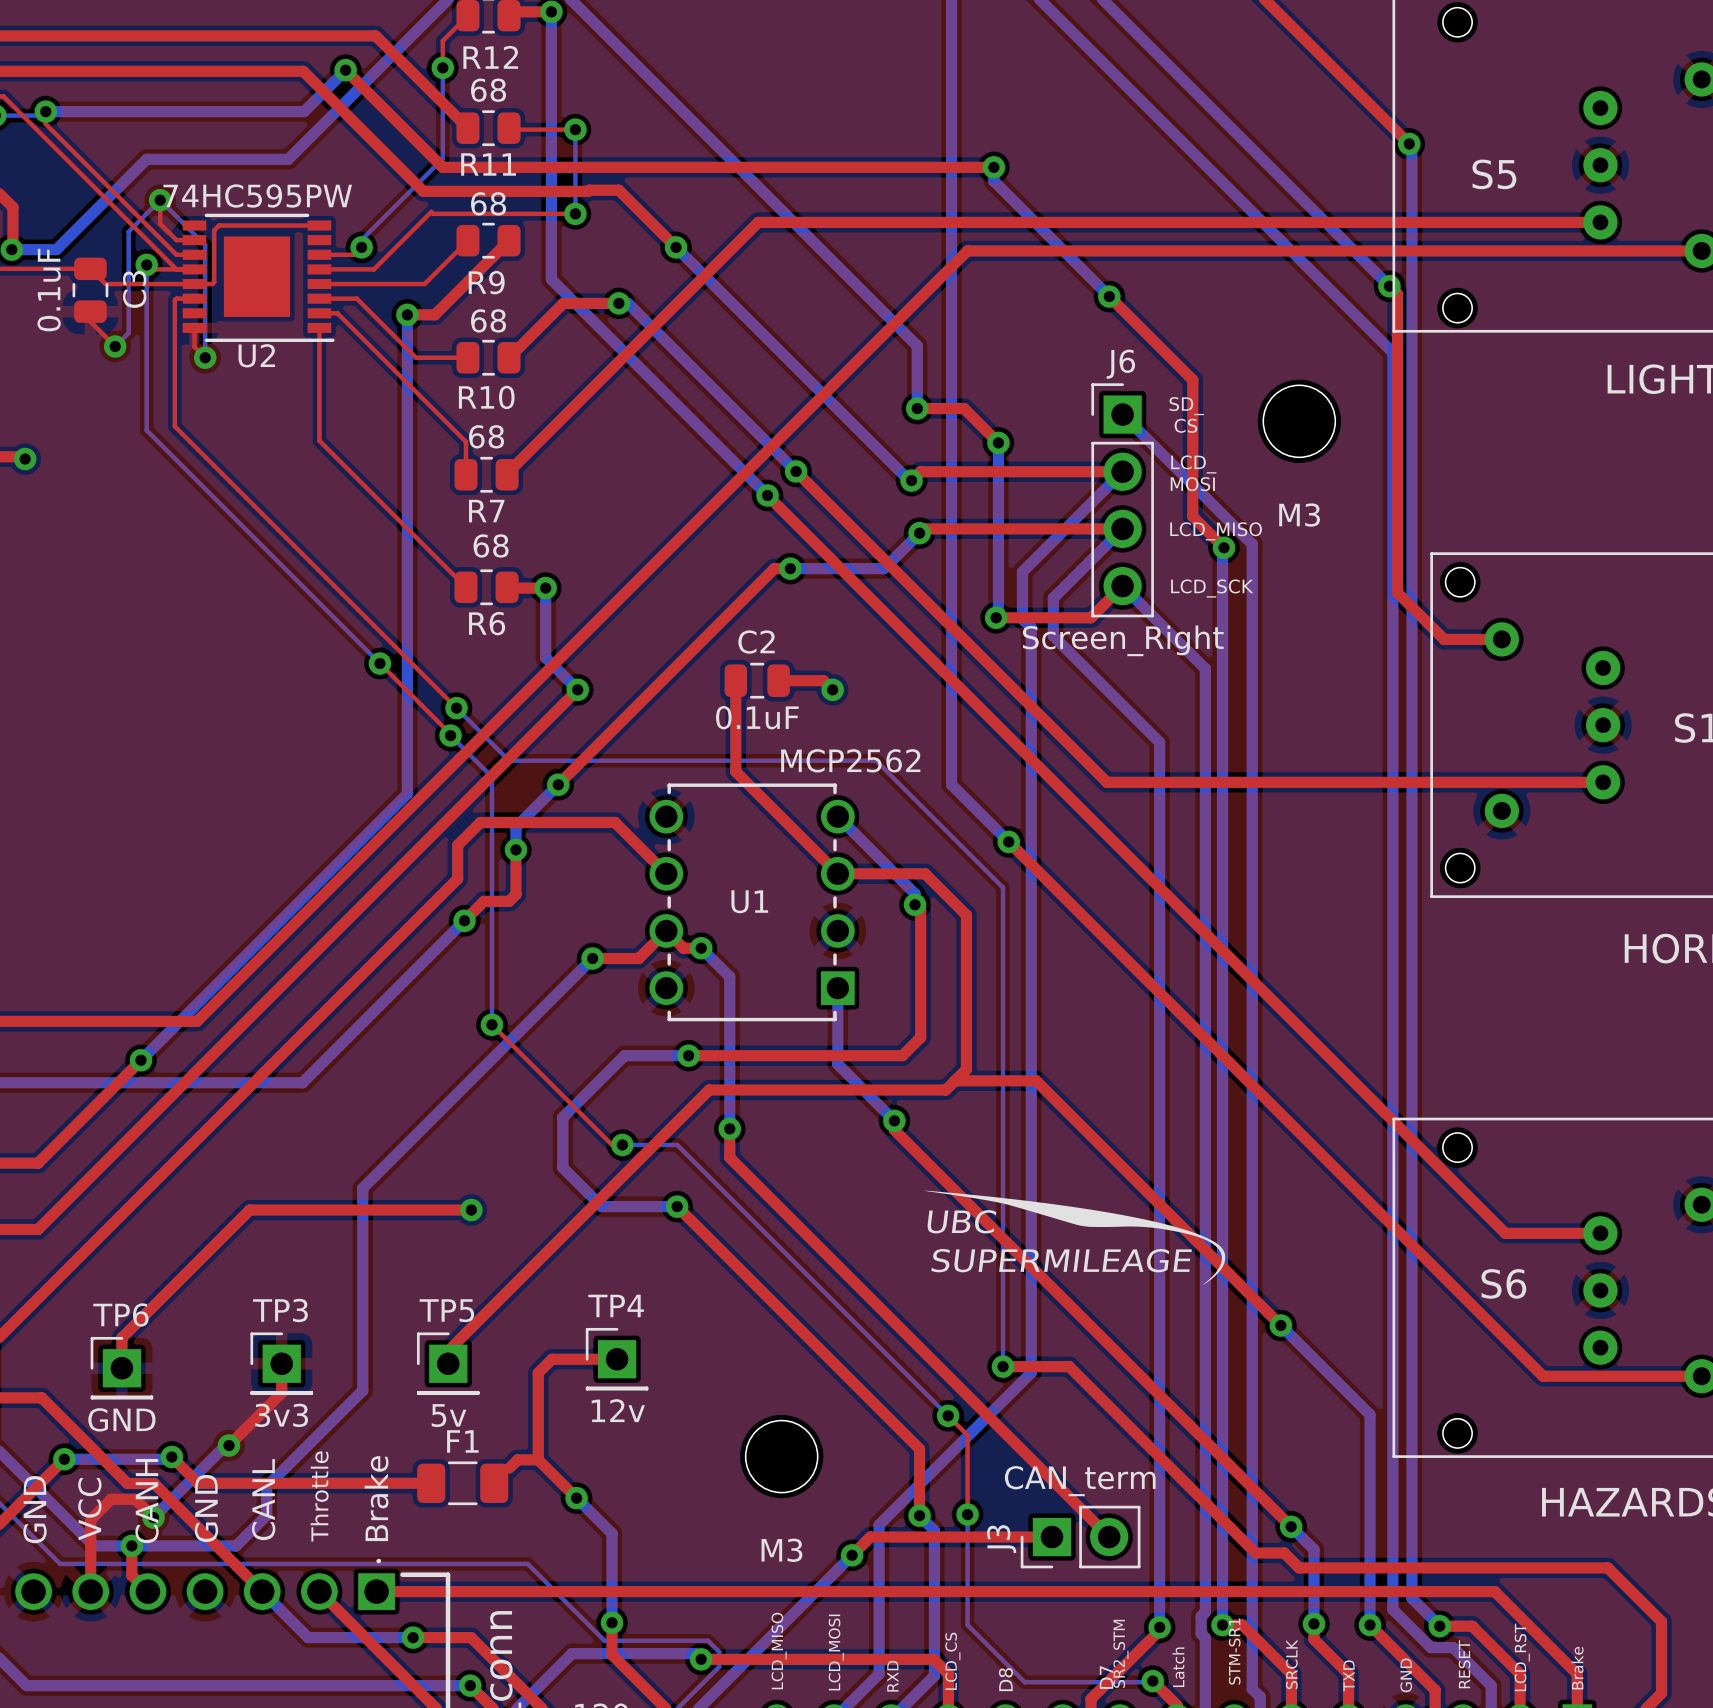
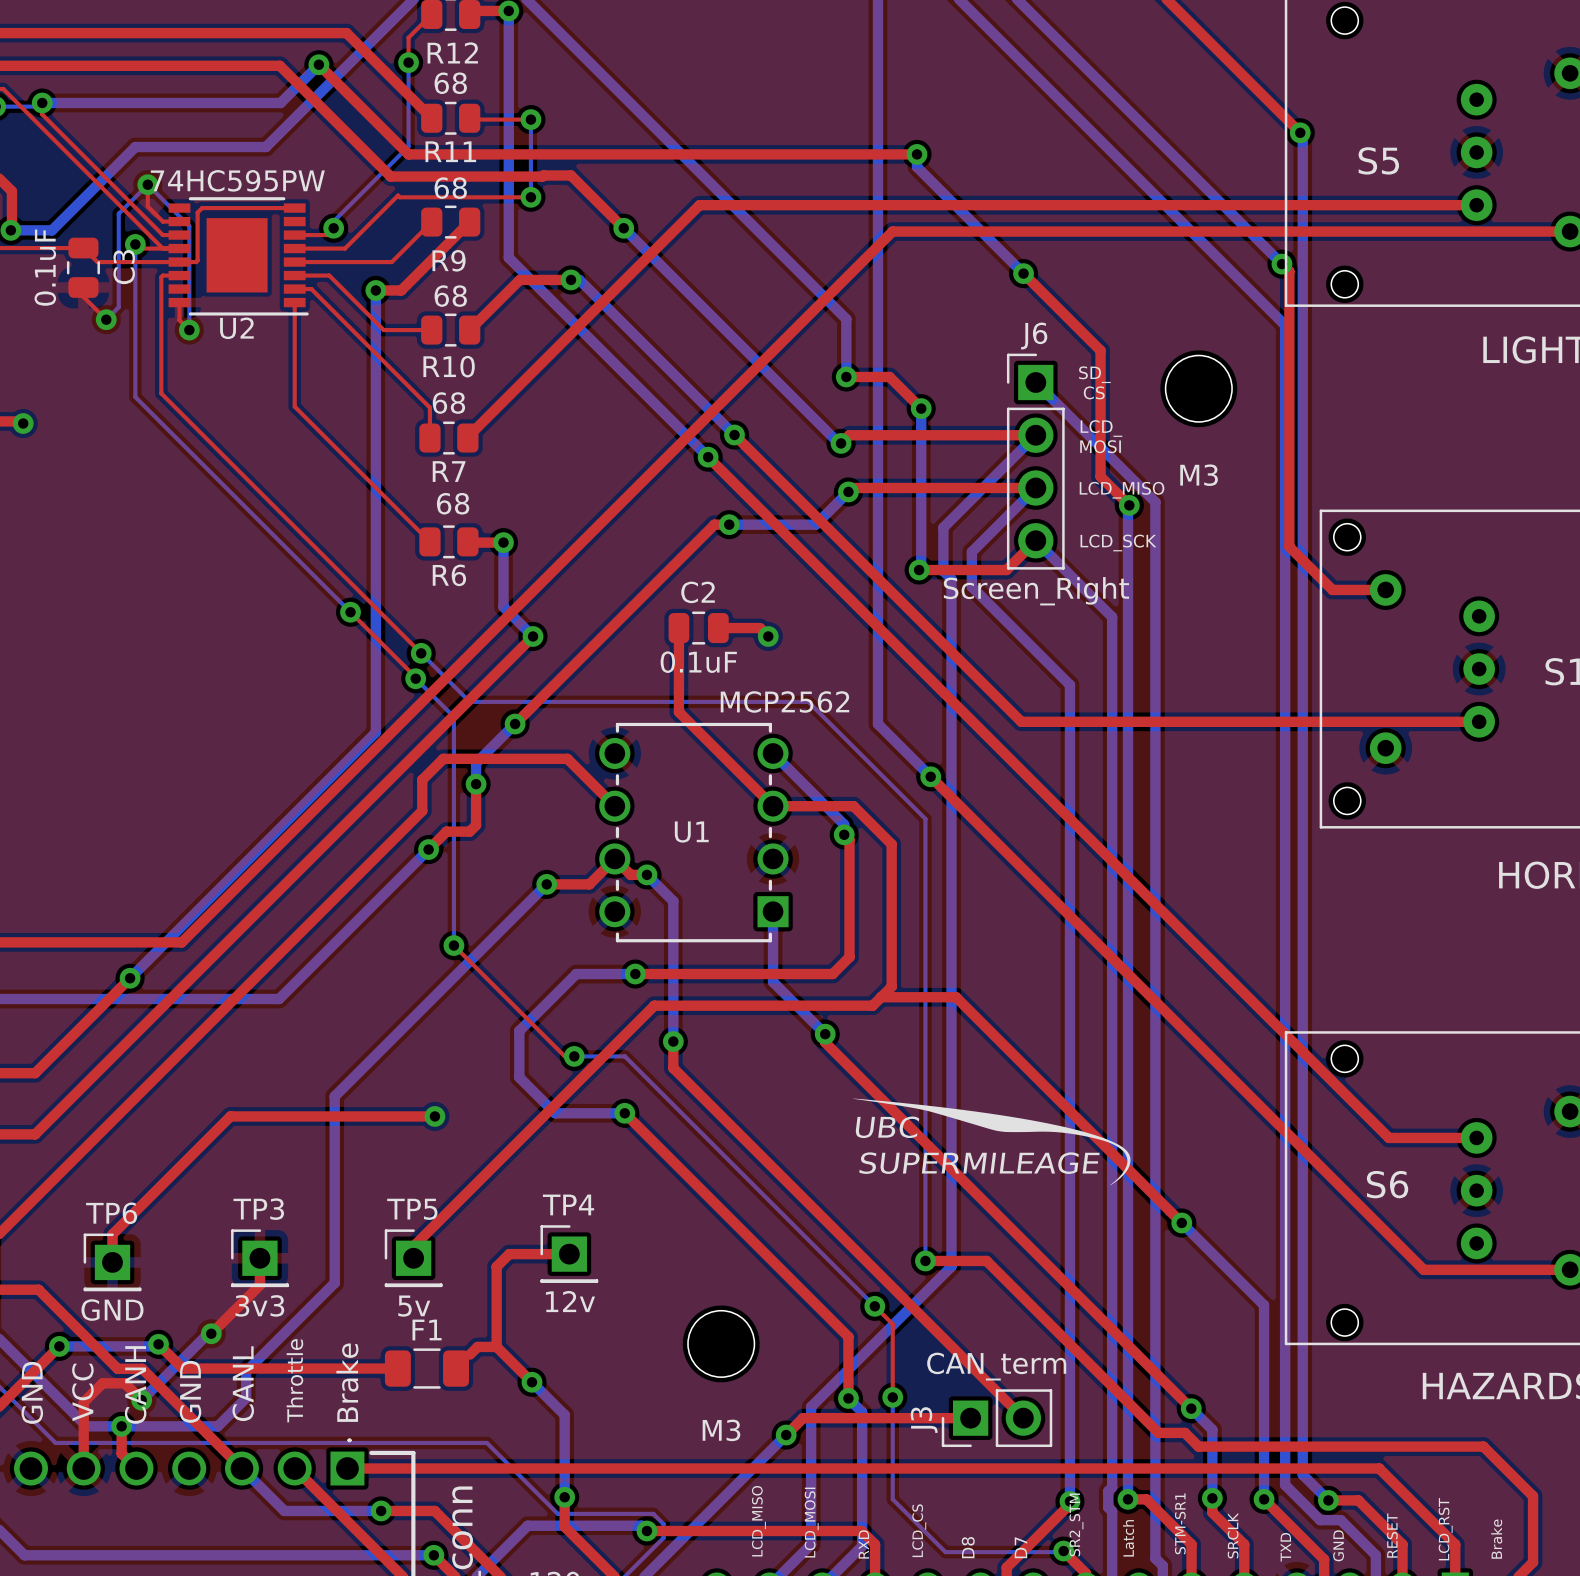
text position: LCD_MISO (779, 1651) -> LCD_MISO (758, 1521)
text position: STM-SR1 (1234, 1651) -> STM-SR1 (1180, 1523)
text position: LCD_MOSI (836, 1652) -> LCD_MOSI (811, 1522)
text position: SR2_STM (1120, 1653) -> SR2_STM (1076, 1524)
text position: LCD_RST (1522, 1657) -> LCD_RST (1445, 1529)
text position: LCD_CS (952, 1661) -> LCD_CS (919, 1530)
text position: SRCLK (1291, 1664) -> SRCLK (1233, 1535)
text position: RESET (1464, 1664) -> RESET (1392, 1535)
text position: Latch (1178, 1667) -> Latch (1128, 1538)
text position: Brake (1577, 1668) -> Brake (1496, 1539)
text position: TXD (1349, 1675) -> TXD (1285, 1547)
text position: GND (1406, 1675) -> GND (1338, 1545)
text position: RXD (892, 1676) -> RXD (863, 1544)
text position: D8 (1005, 1679) -> D8 (968, 1547)

